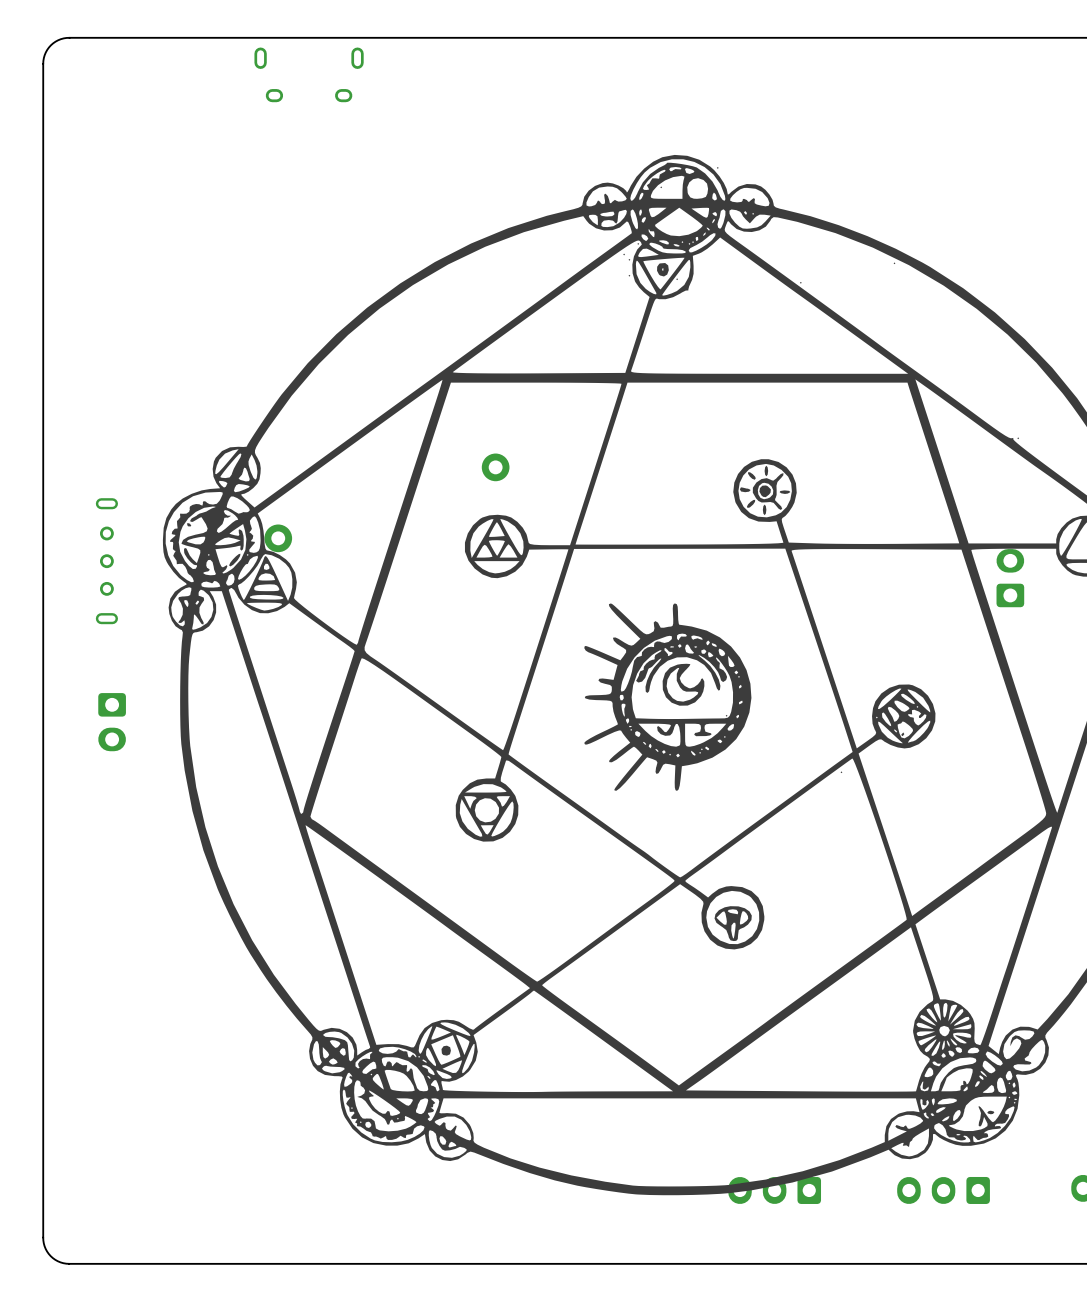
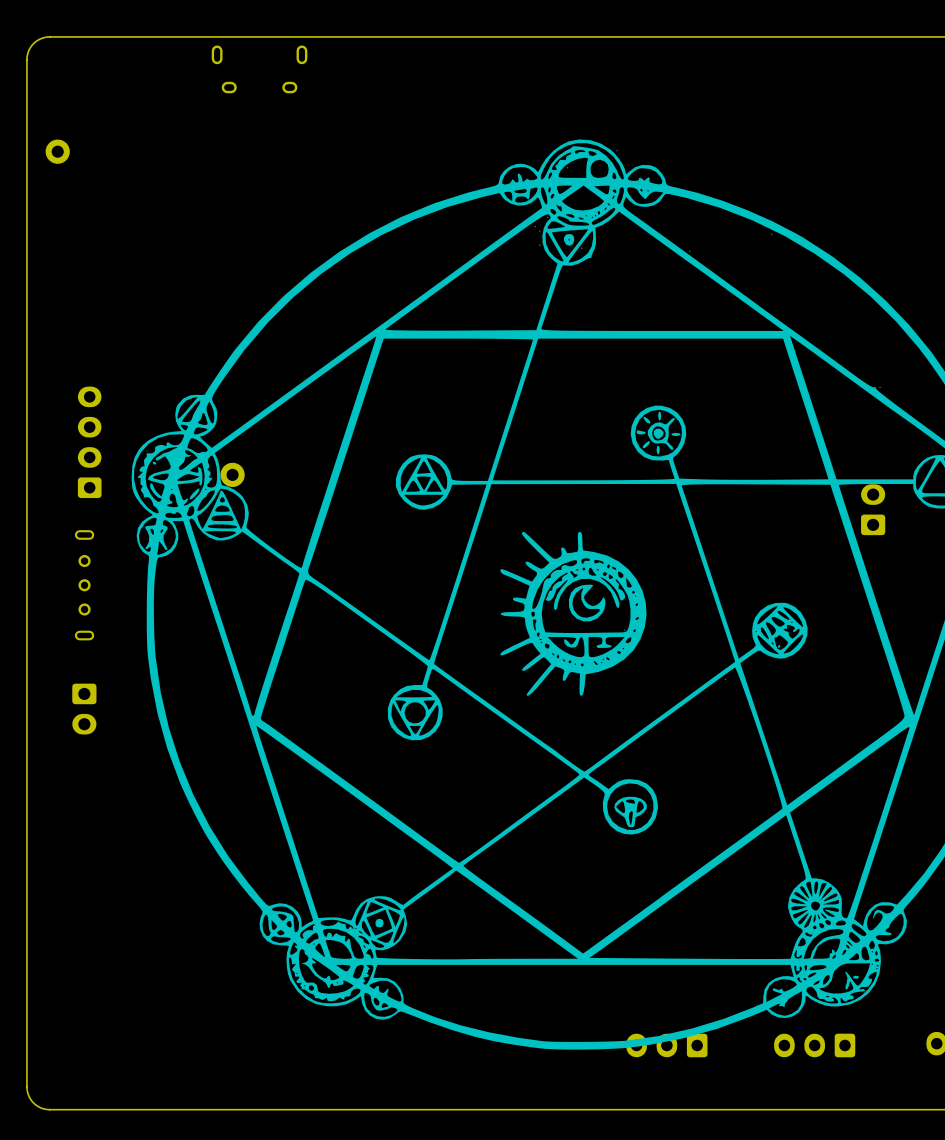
part: none -> (57, 151)
part: (495, 467) -> none
part: none -> (89, 442)
part position: (106, 561) -> (84, 585)
part position: (112, 722) -> (84, 709)

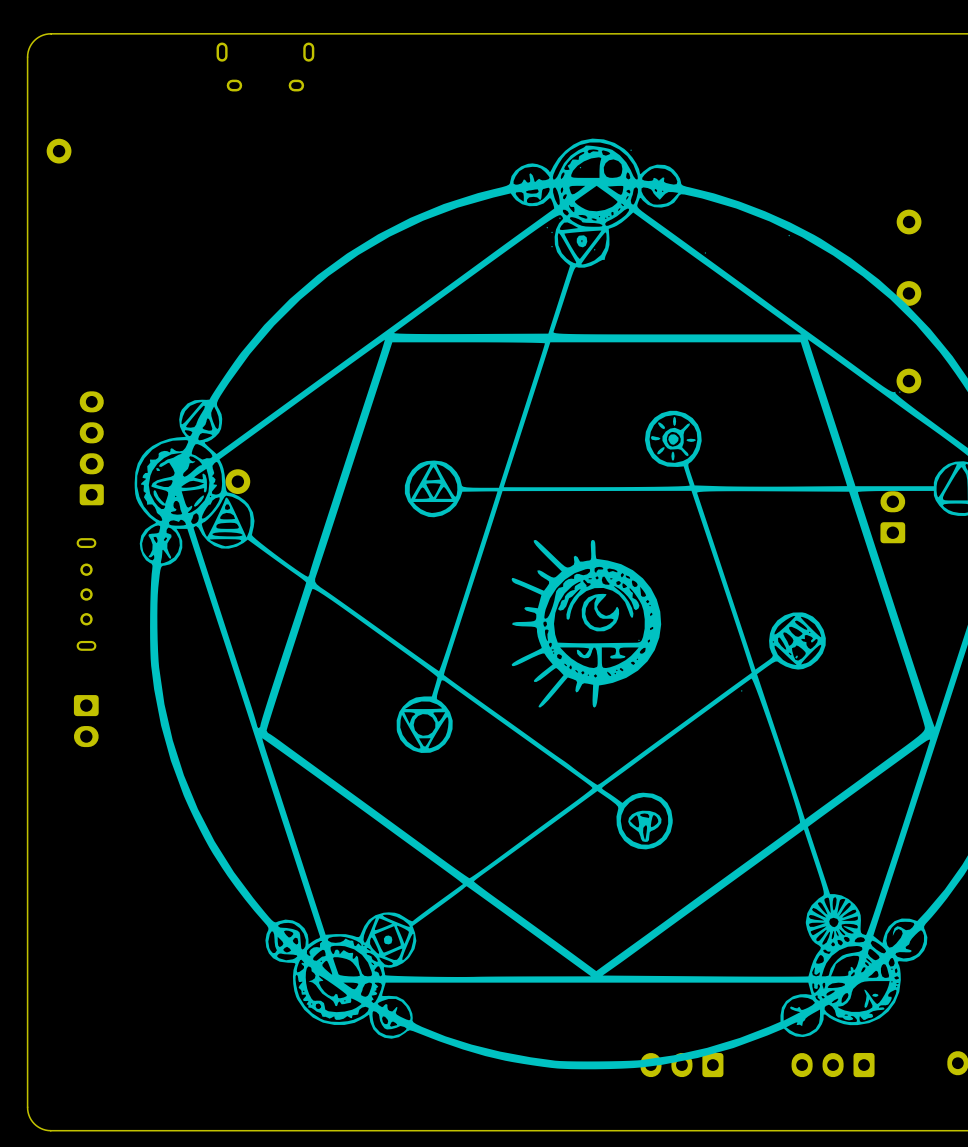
part: none -> (909, 221)
part: none -> (908, 293)
part: none -> (908, 381)

